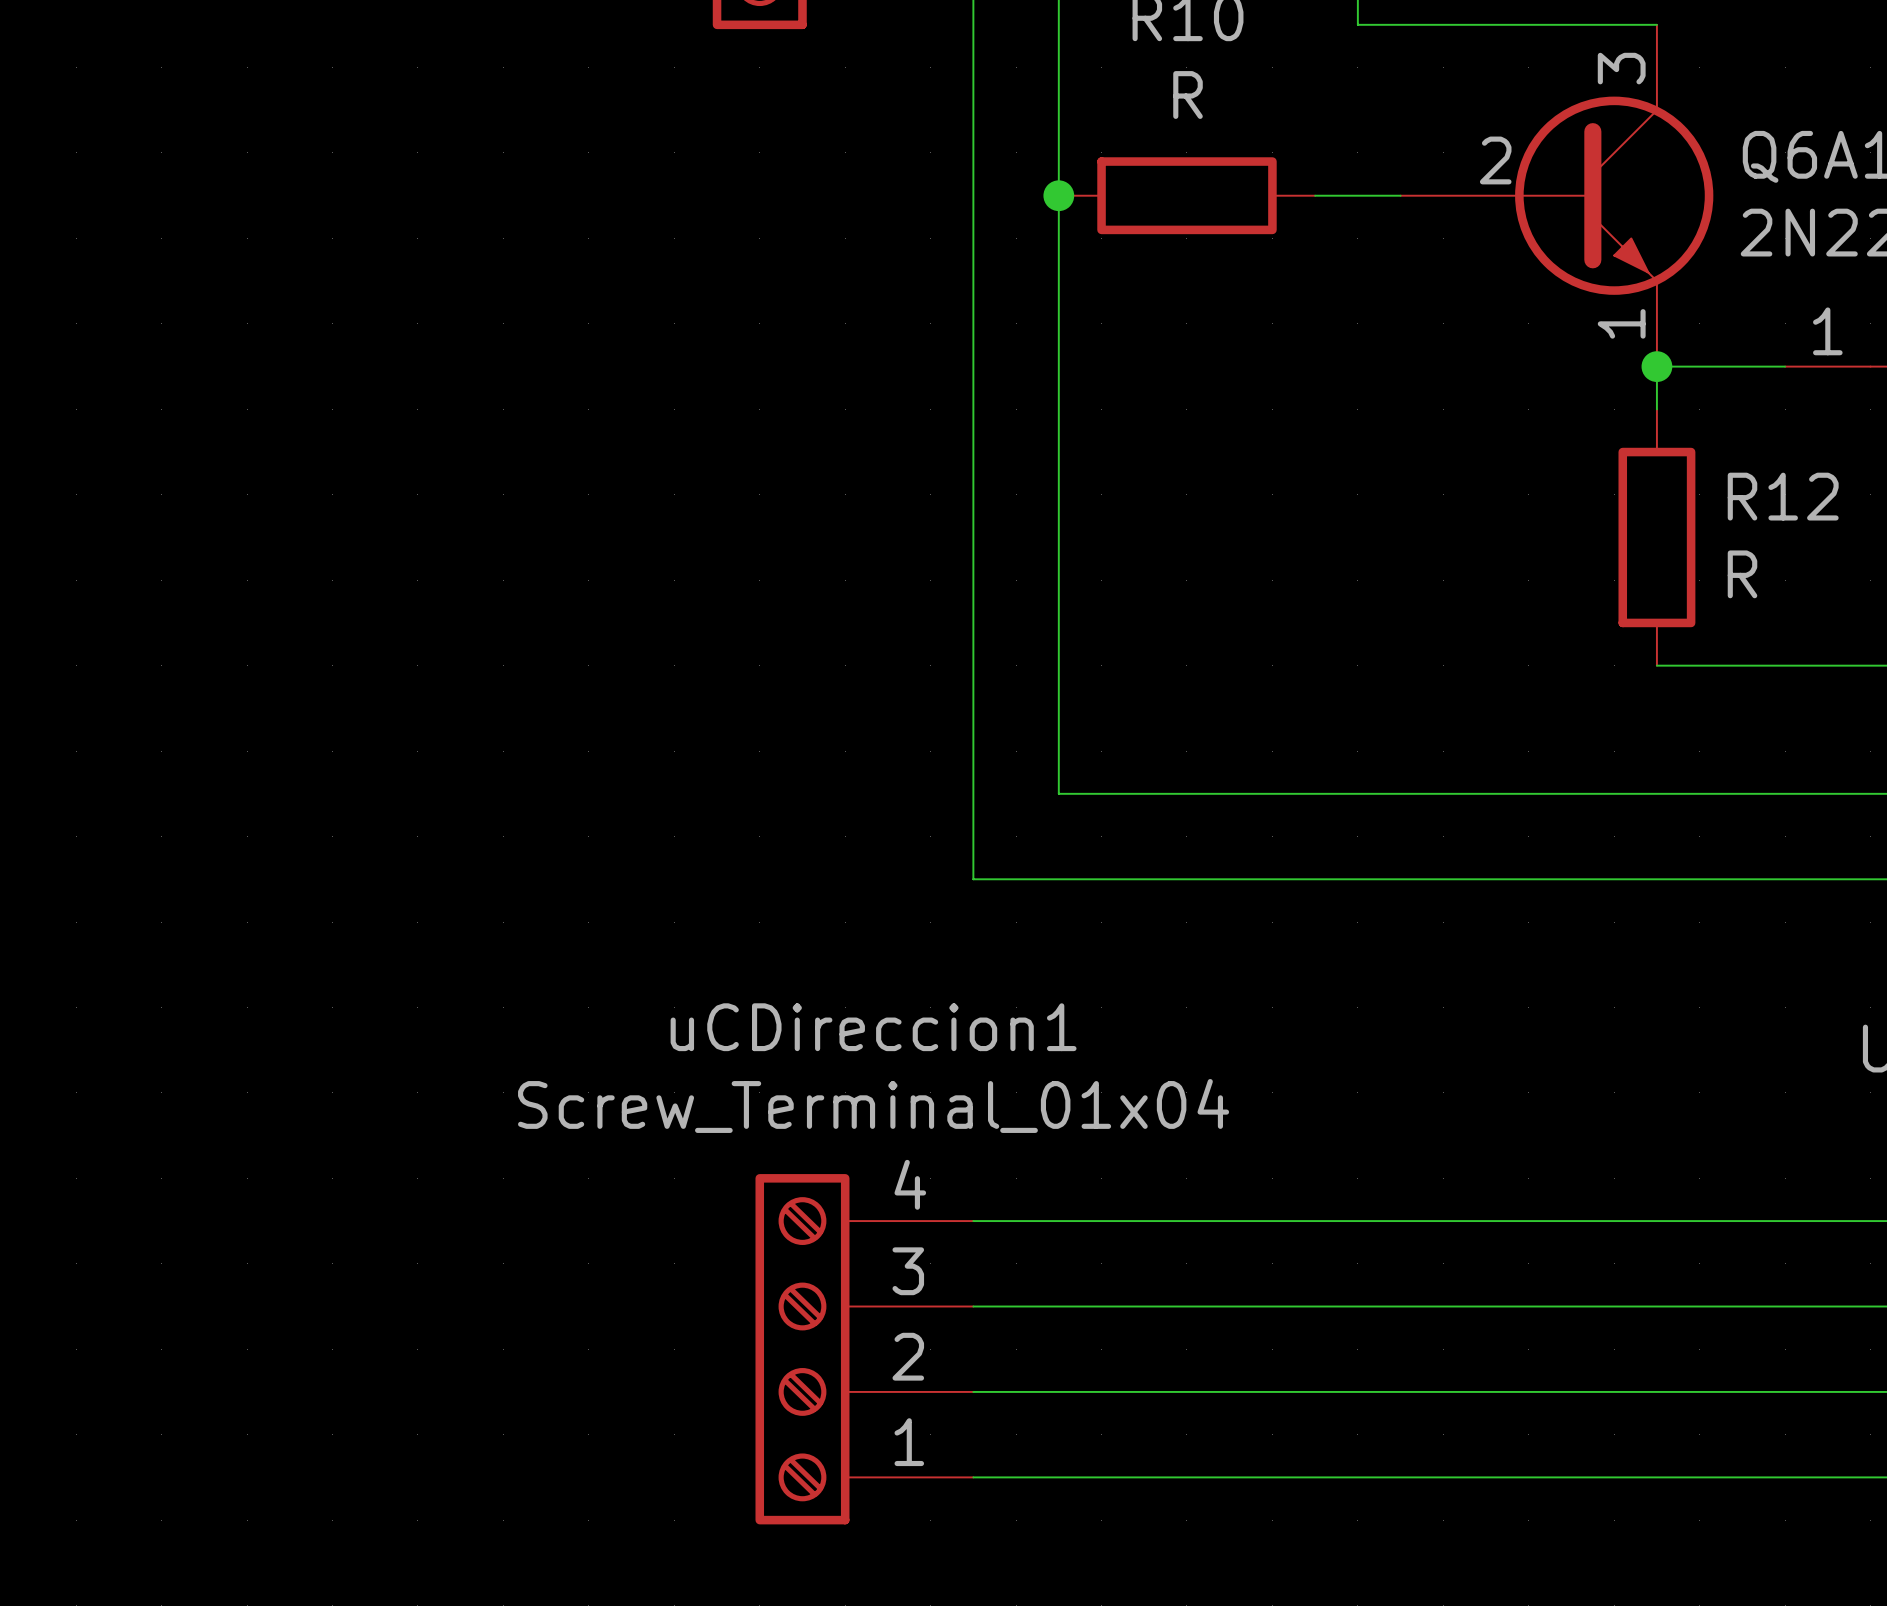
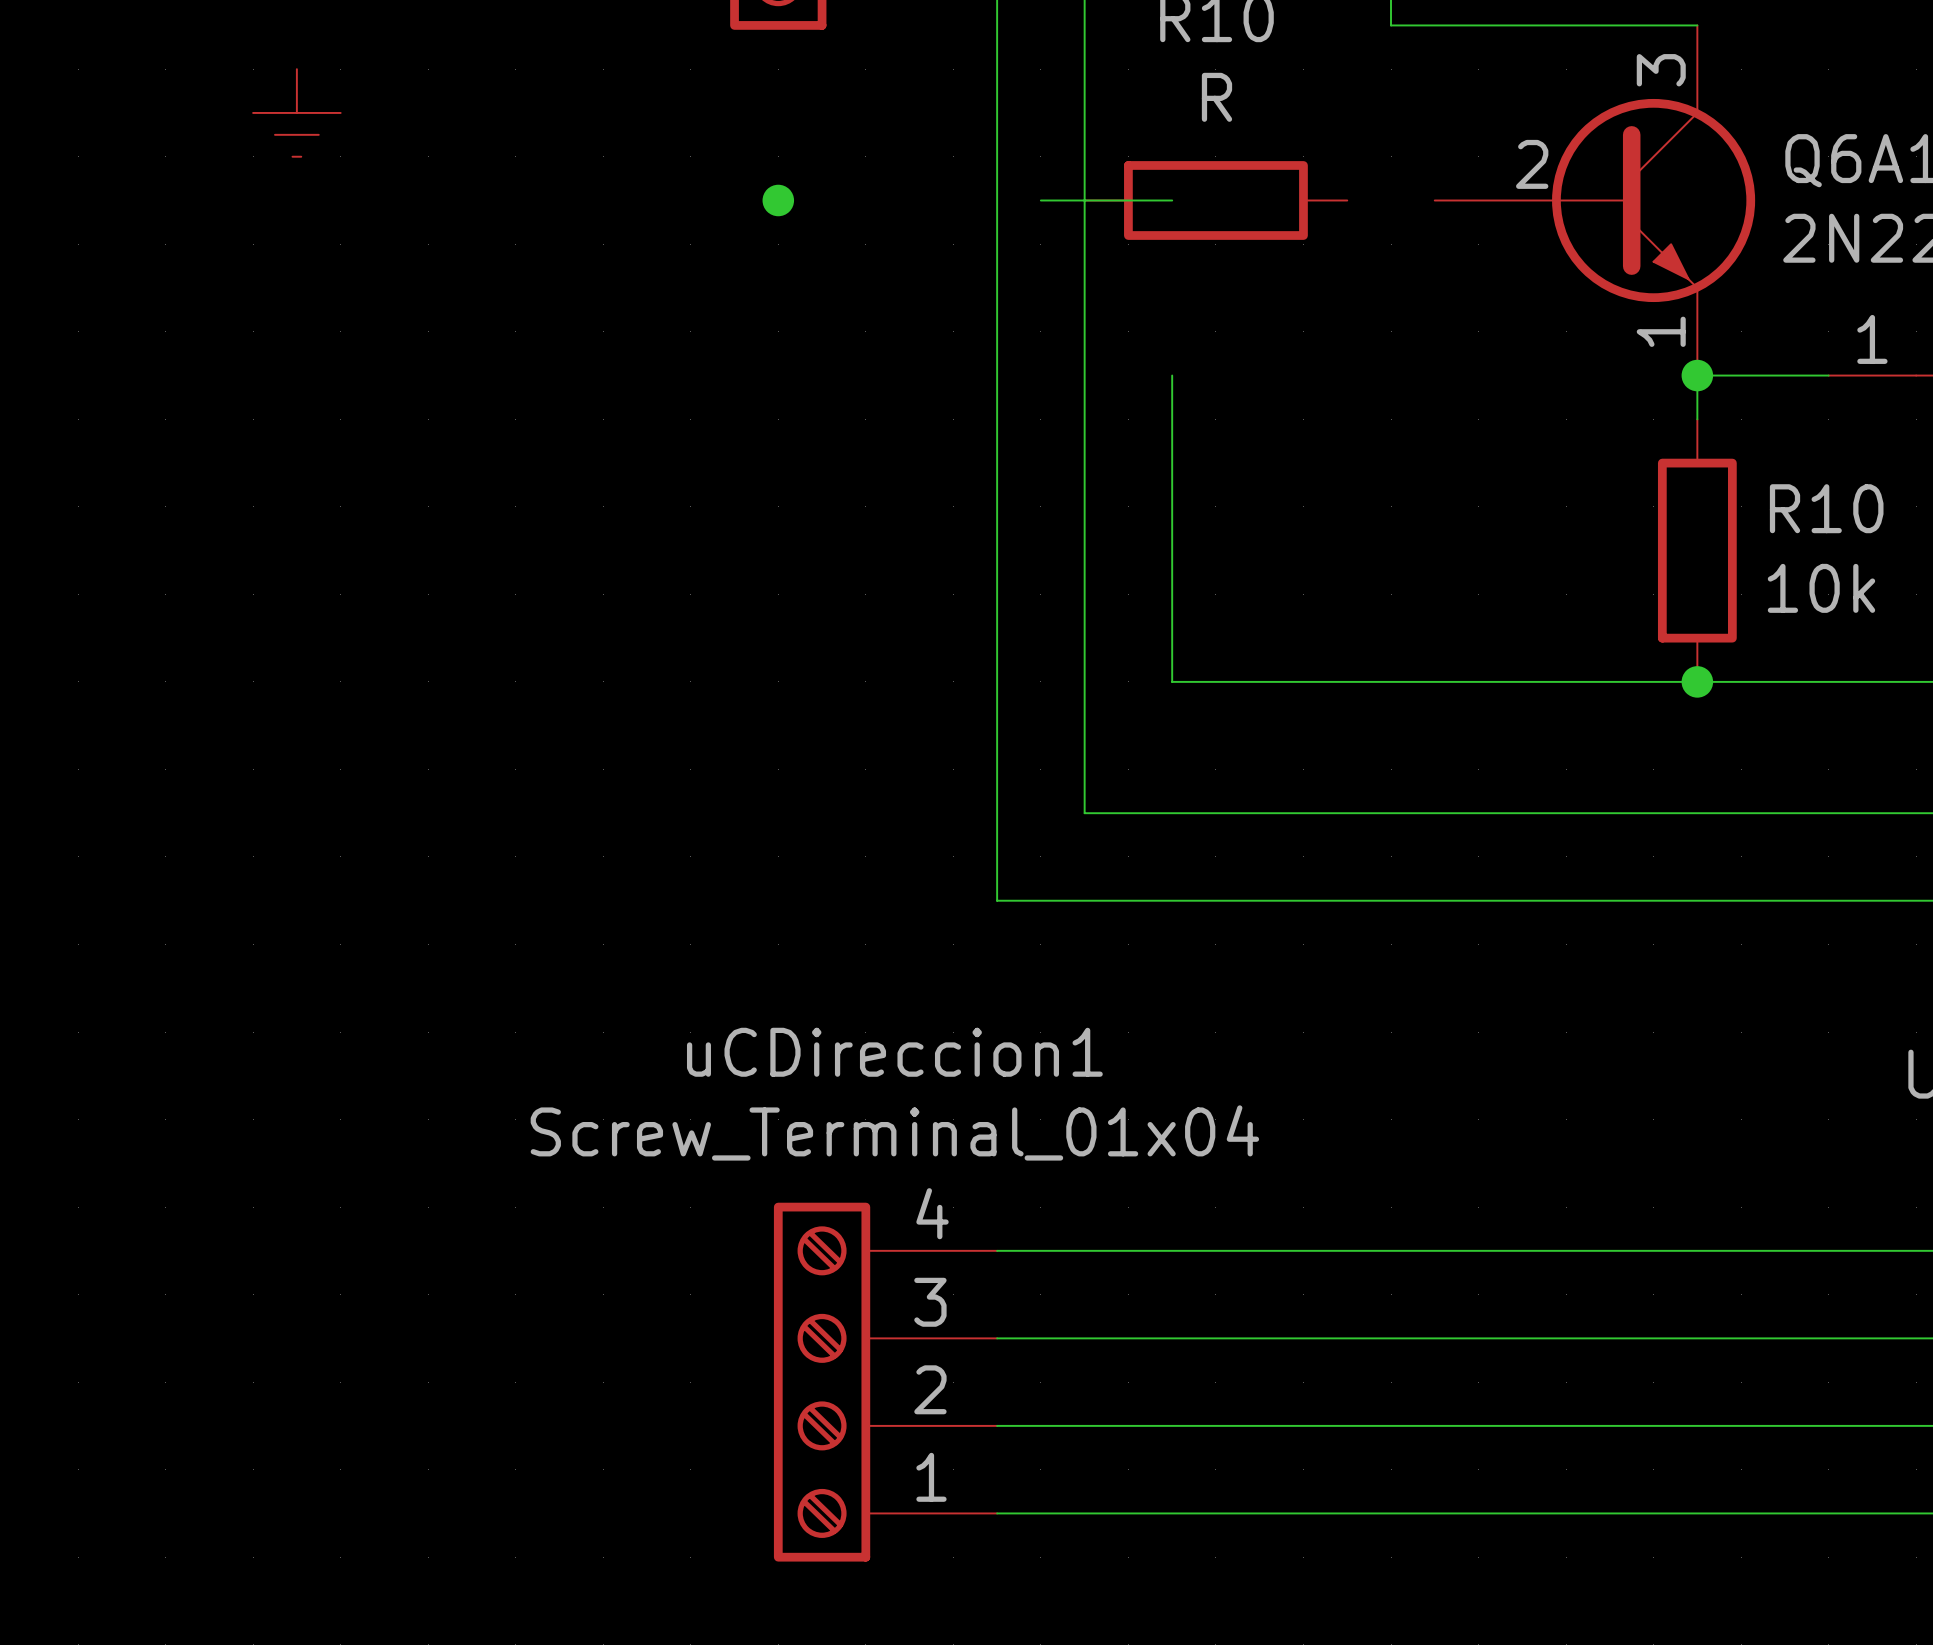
power symbol: none -> (296, 112)
junction: none -> (778, 200)
wire: none -> (1040, 200) (1172, 200)
junction: (1058, 195) -> none
wire: (1315, 195) (1400, 195) -> none
wire: none -> (1172, 375) (1172, 681) (1697, 681)
R12 name: R12 (1783, 496) -> R10 (1826, 508)
R12 value: R (1742, 574) -> 10k (1821, 588)
junction: none -> (1697, 681)

